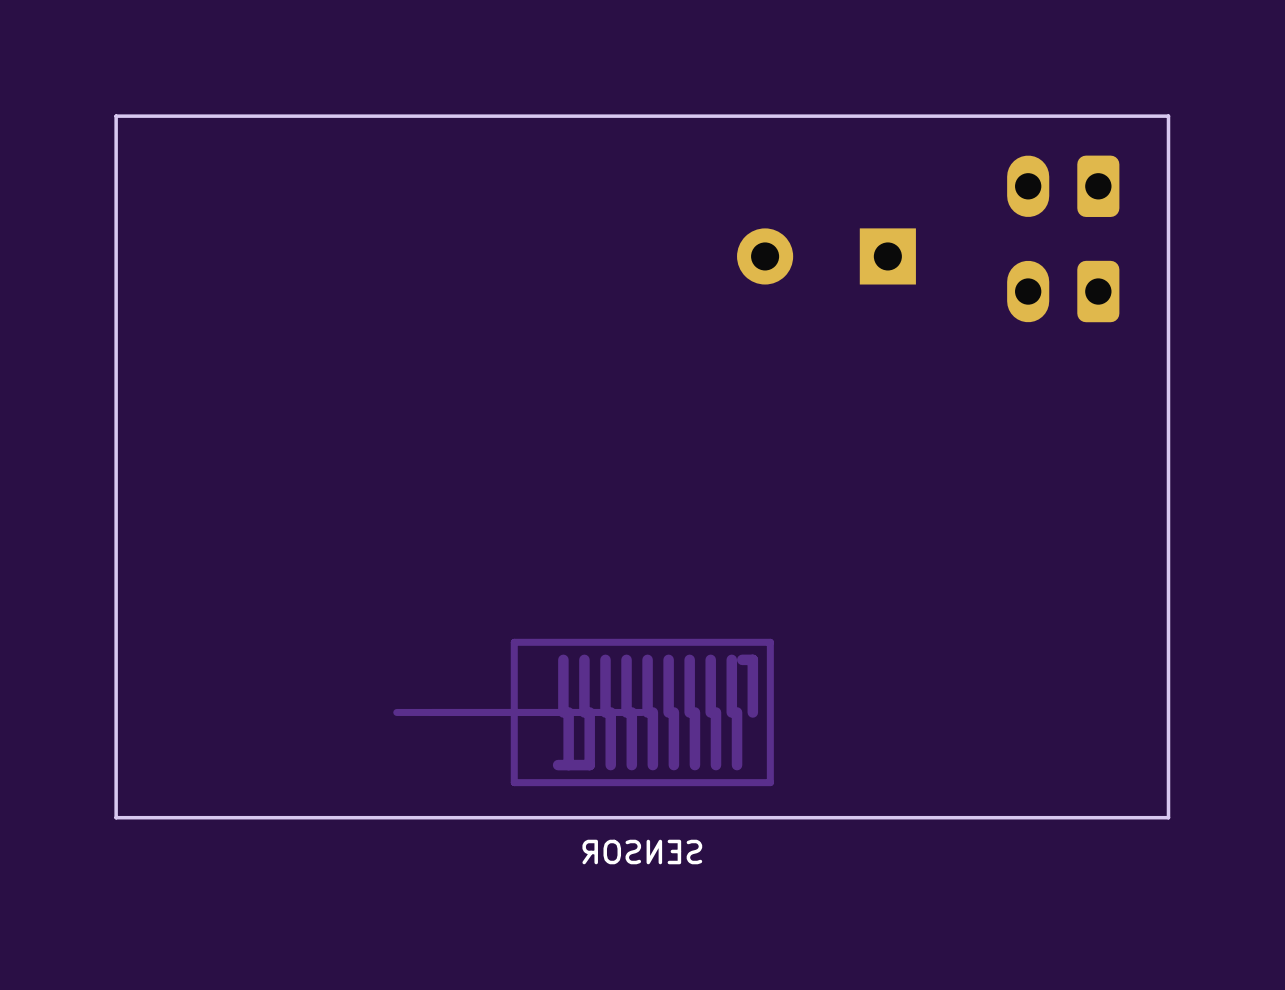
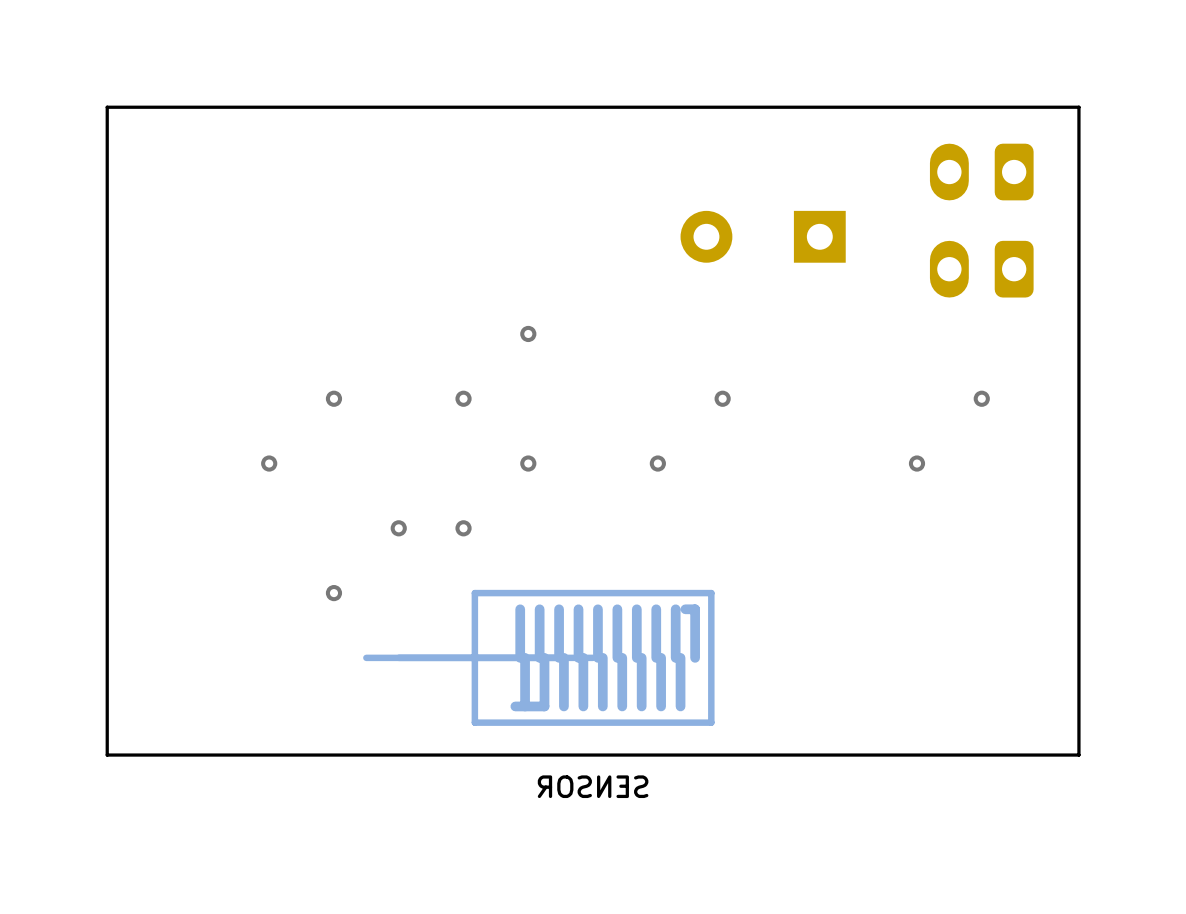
via: none -> (528, 333)
via: none -> (333, 398)
via: none -> (463, 398)
via: none -> (722, 398)
via: none -> (981, 398)
via: none -> (269, 463)
via: none -> (528, 463)
via: none -> (657, 463)
via: none -> (916, 463)
via: none -> (398, 528)
via: none -> (463, 528)
via: none -> (333, 593)

